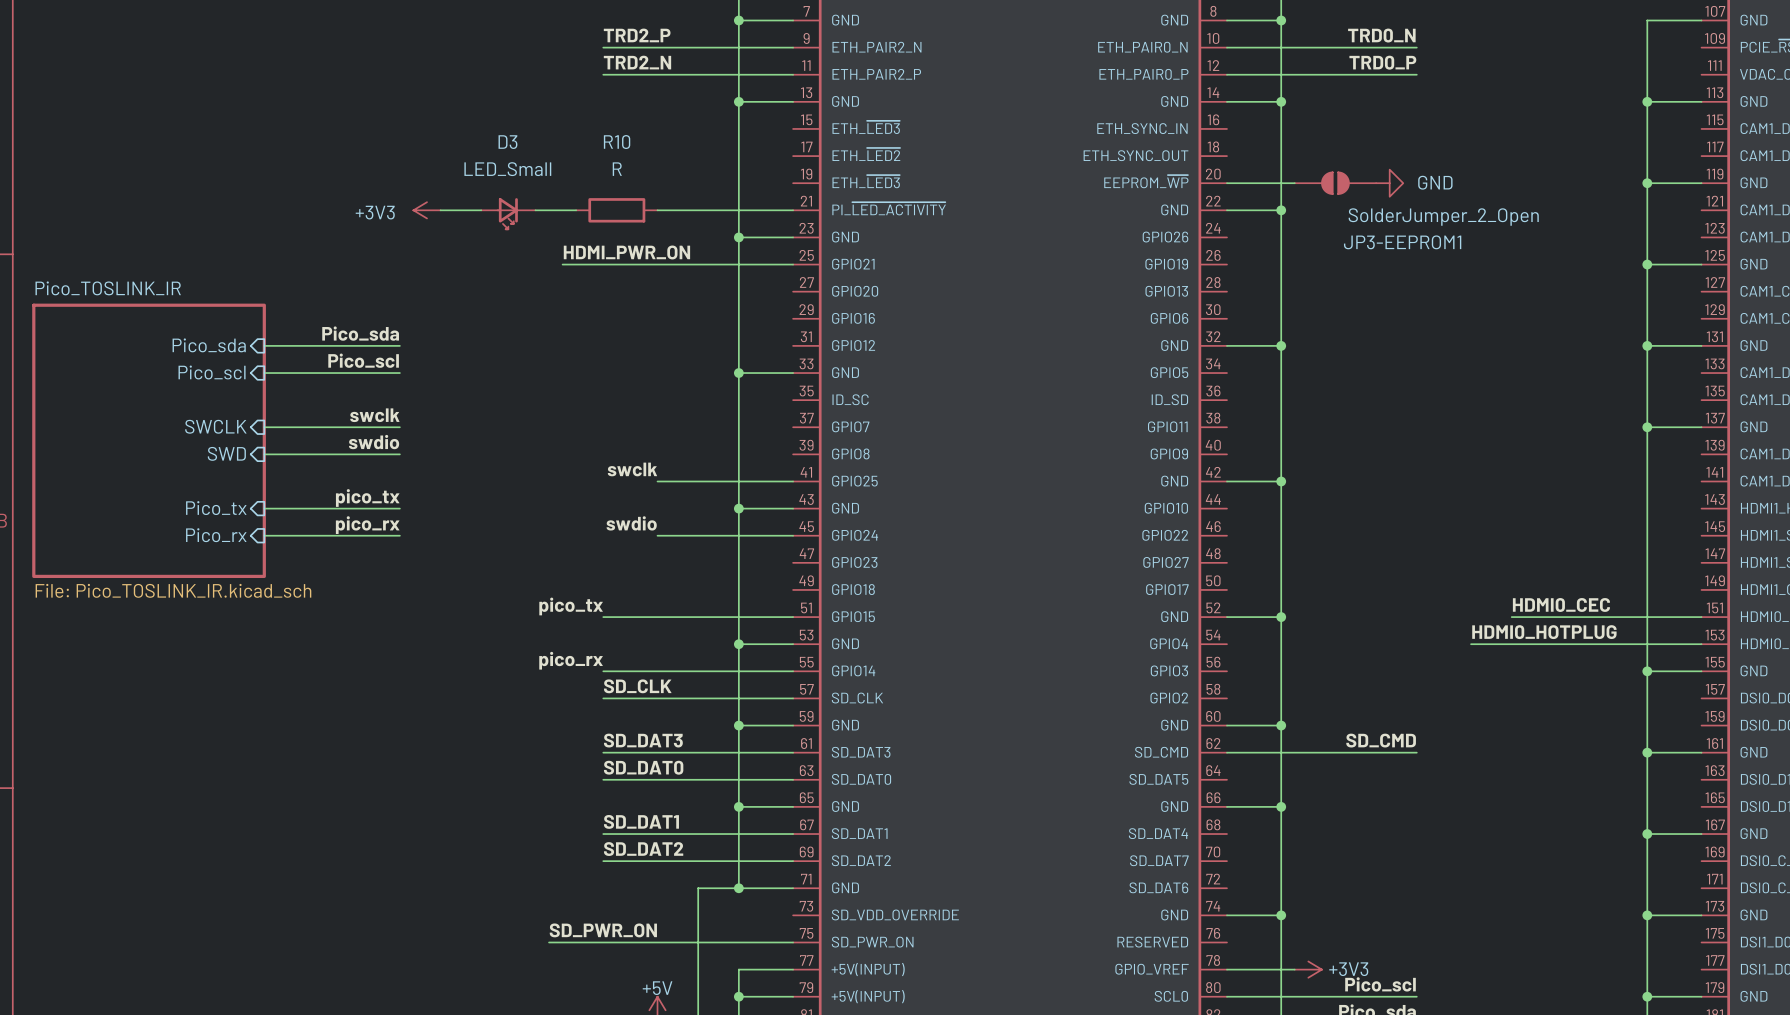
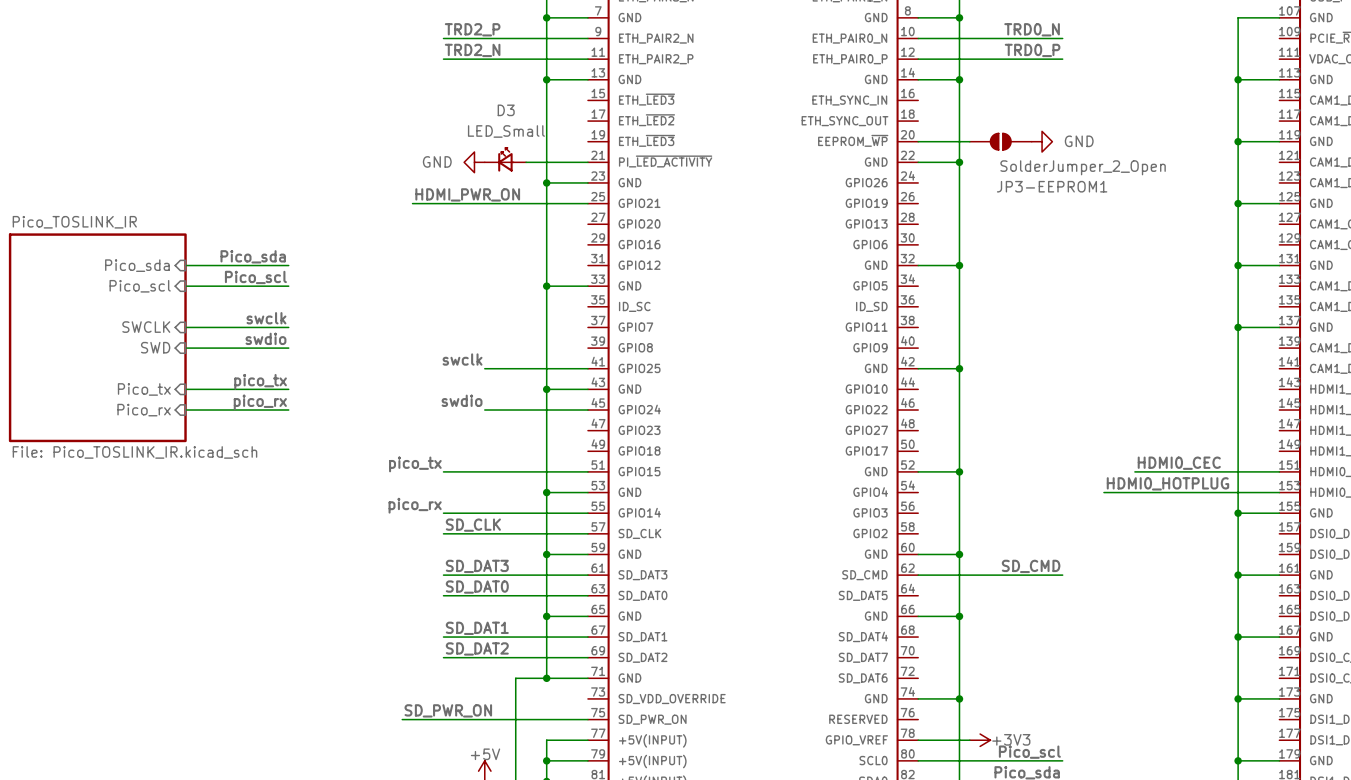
power symbol: +3V3 (427, 210) -> none
wire: (440, 210) (481, 210) -> none
wire: (535, 210) (576, 210) -> none
R10: R (616, 210) -> none
power symbol: none -> GND (474, 162)
D3 rotation: 0° (507, 213) -> 180° (505, 159)
D3 position: (508, 213) -> (505, 159)

